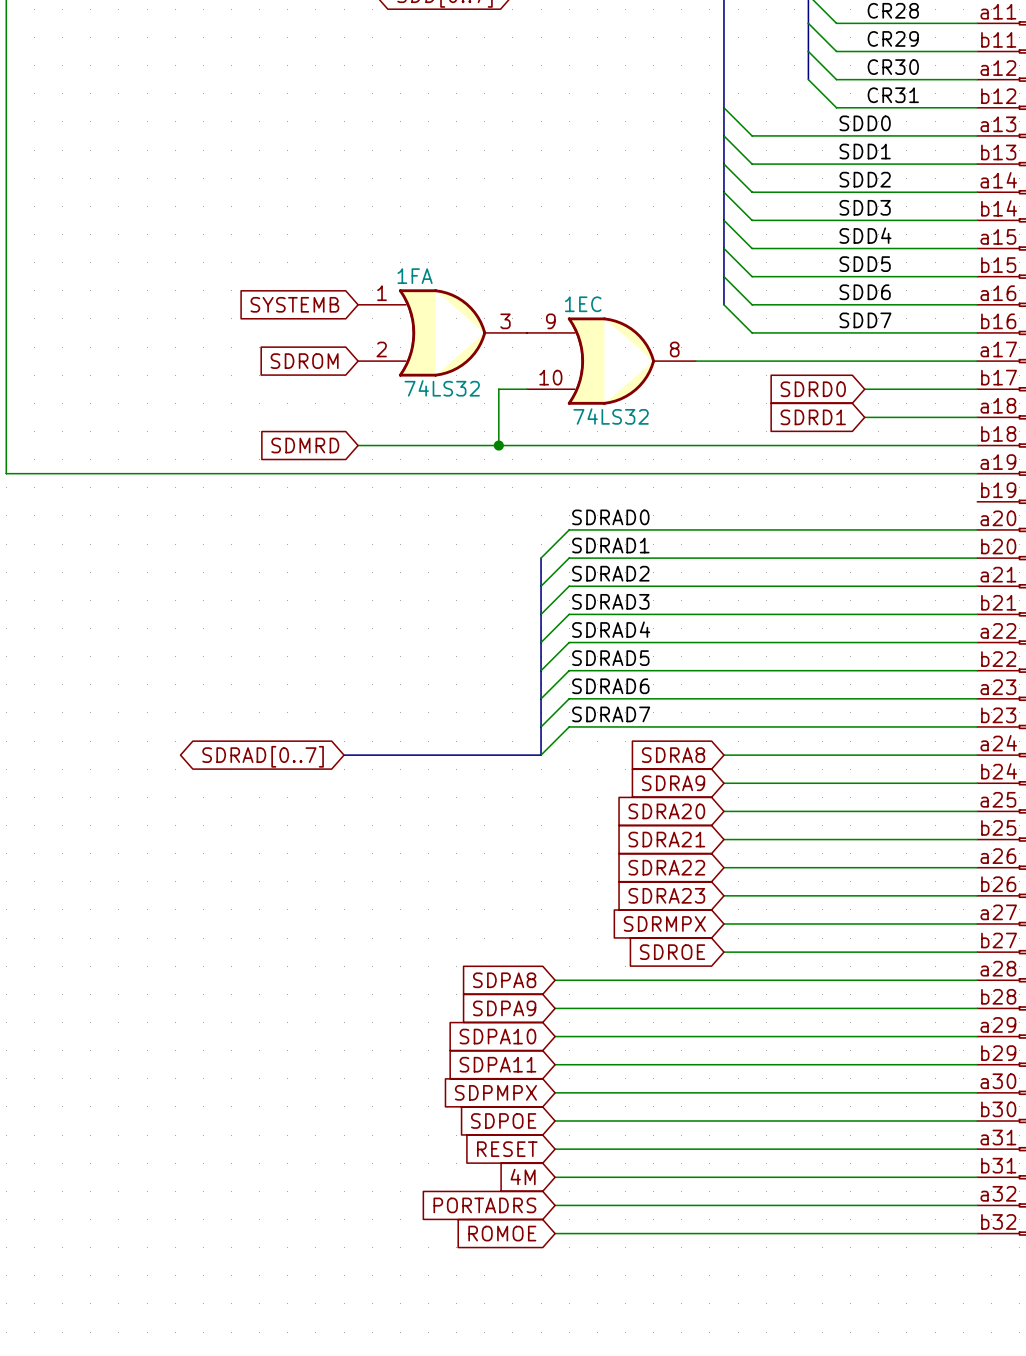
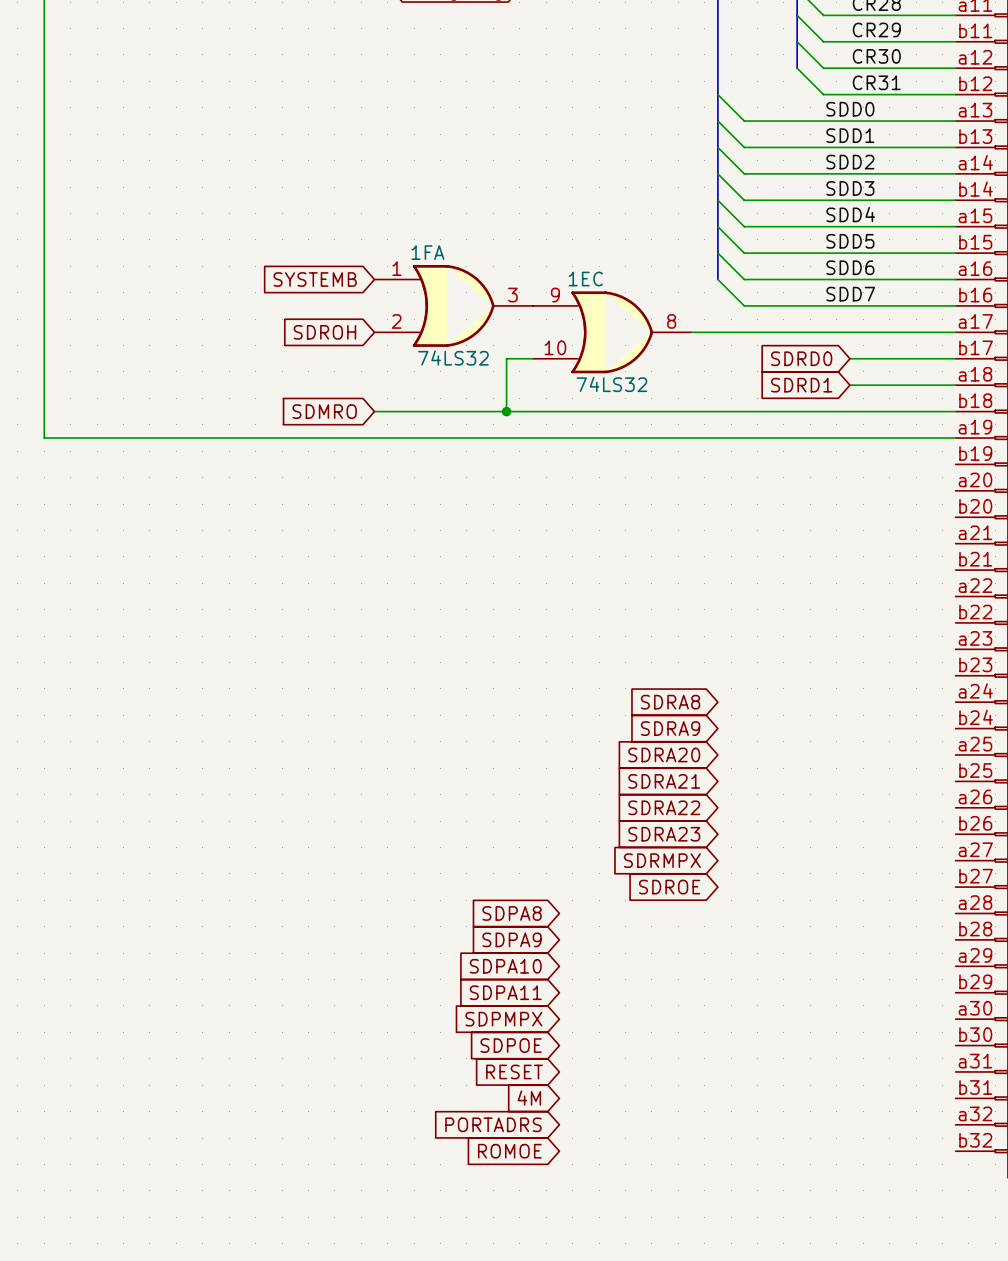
global label: SDROM (304, 361) -> SDROH (324, 332)
global label: SDMRD (305, 445) -> SDMRO (324, 411)
label: SDRAD0 (610, 517) -> none
wire: (977, 529) (569, 529) (541, 558) -> none
label: SDRAD1 (610, 545) -> none
bus: (541, 558) (541, 755) (344, 755) -> none
wire: (977, 558) (569, 558) (541, 586) -> none
label: SDRAD2 (610, 573) -> none
wire: (977, 586) (569, 586) (541, 614) -> none
label: SDRAD3 (610, 601) -> none
wire: (977, 614) (569, 614) (541, 642) -> none
label: SDRAD4 (611, 629) -> none
wire: (977, 642) (569, 642) (541, 670) -> none
label: SDRAD5 (610, 658) -> none
wire: (977, 670) (569, 670) (541, 698) -> none
label: SDRAD6 (610, 686) -> none
wire: (977, 698) (569, 698) (541, 726) -> none
label: SDRAD7 (611, 714) -> none
wire: (977, 726) (569, 726) (541, 755) -> none
wire: (723, 755) (977, 755) -> none
global label: SDRAD[0..7] (263, 756) -> none
wire: (723, 783) (977, 783) -> none
wire: (723, 811) (977, 811) -> none
wire: (723, 839) (977, 839) -> none
wire: (723, 867) (977, 867) -> none
wire: (723, 895) (977, 895) -> none
wire: (723, 923) (977, 923) -> none
wire: (723, 952) (977, 952) -> none
wire: (555, 980) (977, 980) -> none
wire: (555, 1008) (977, 1008) -> none
wire: (555, 1036) (977, 1036) -> none
wire: (555, 1064) (977, 1064) -> none
wire: (555, 1092) (977, 1092) -> none
wire: (555, 1121) (977, 1121) -> none
wire: (555, 1149) (977, 1149) -> none
wire: (555, 1177) (977, 1177) -> none
wire: (555, 1205) (977, 1205) -> none
wire: (555, 1233) (977, 1233) -> none

